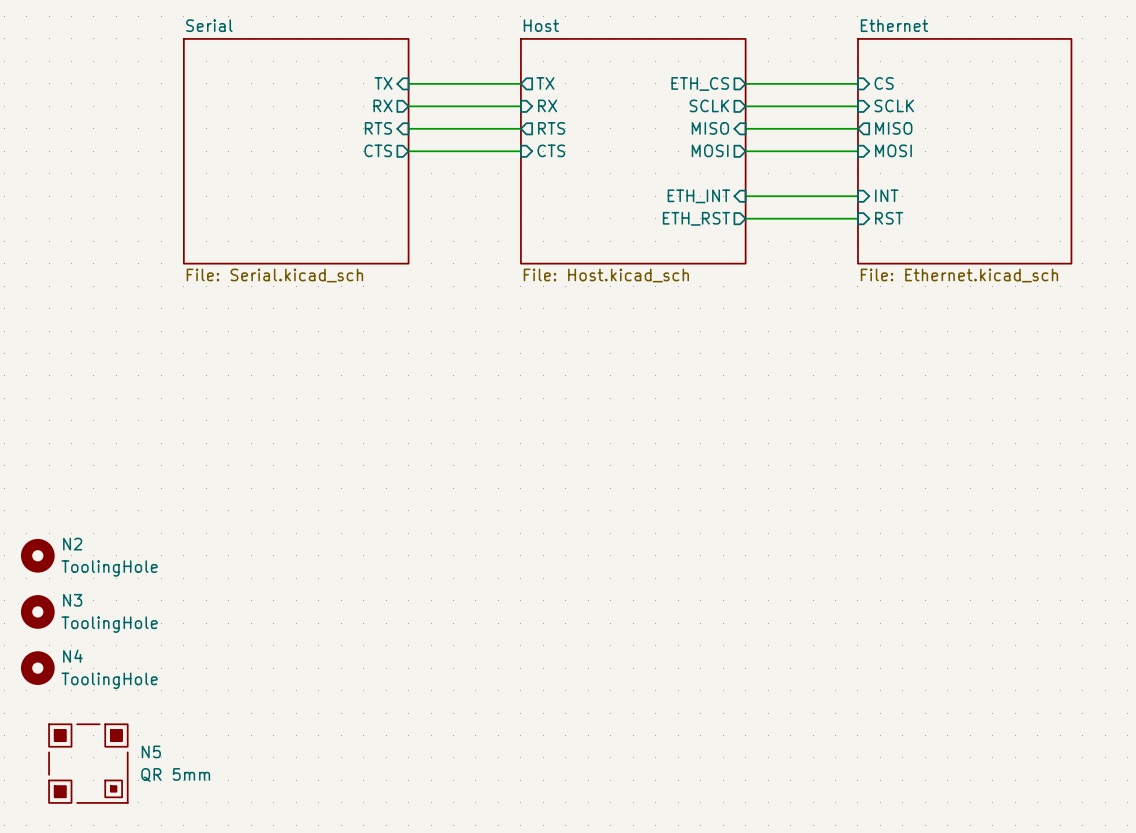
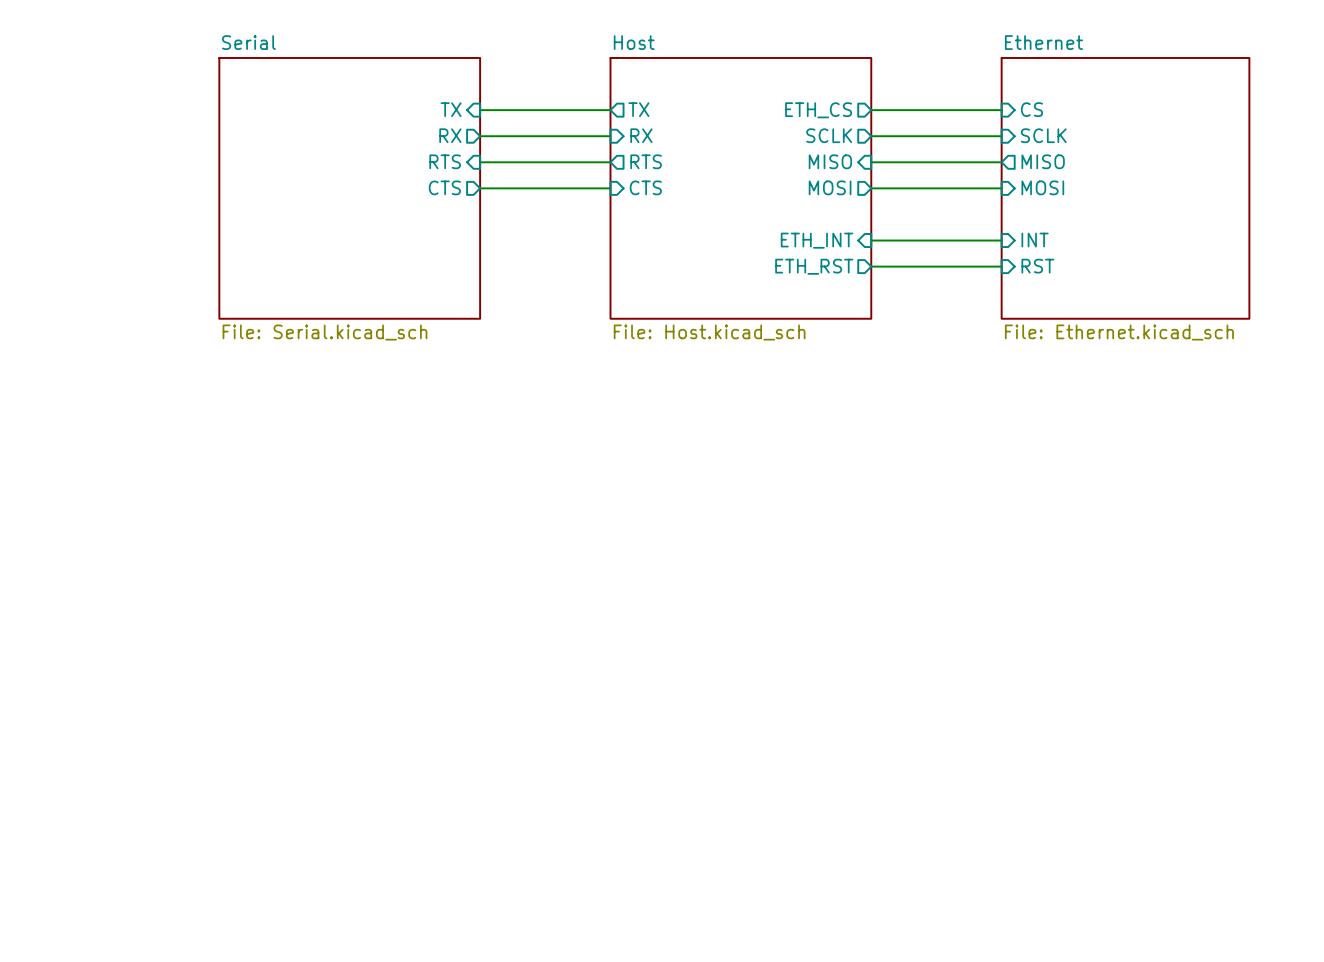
N2: ToolingHole (37, 555) -> none
N3: ToolingHole (37, 611) -> none
N4: ToolingHole (37, 668) -> none
N5: QR 5mm (88, 763) -> none

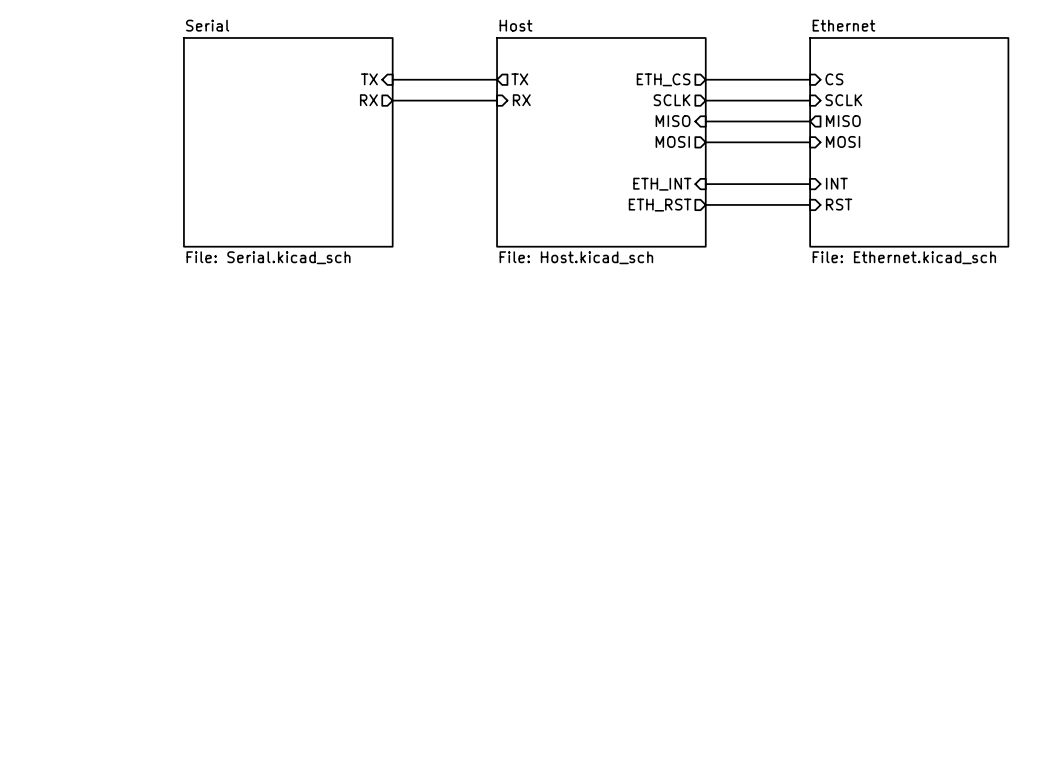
sheet pin: RTS (445, 161) -> none
sheet pin: RTS (646, 161) -> none
wire: (480, 162) (610, 162) -> none
sheet pin: CTS (444, 187) -> none
sheet pin: CTS (645, 187) -> none
wire: (480, 188) (610, 188) -> none

